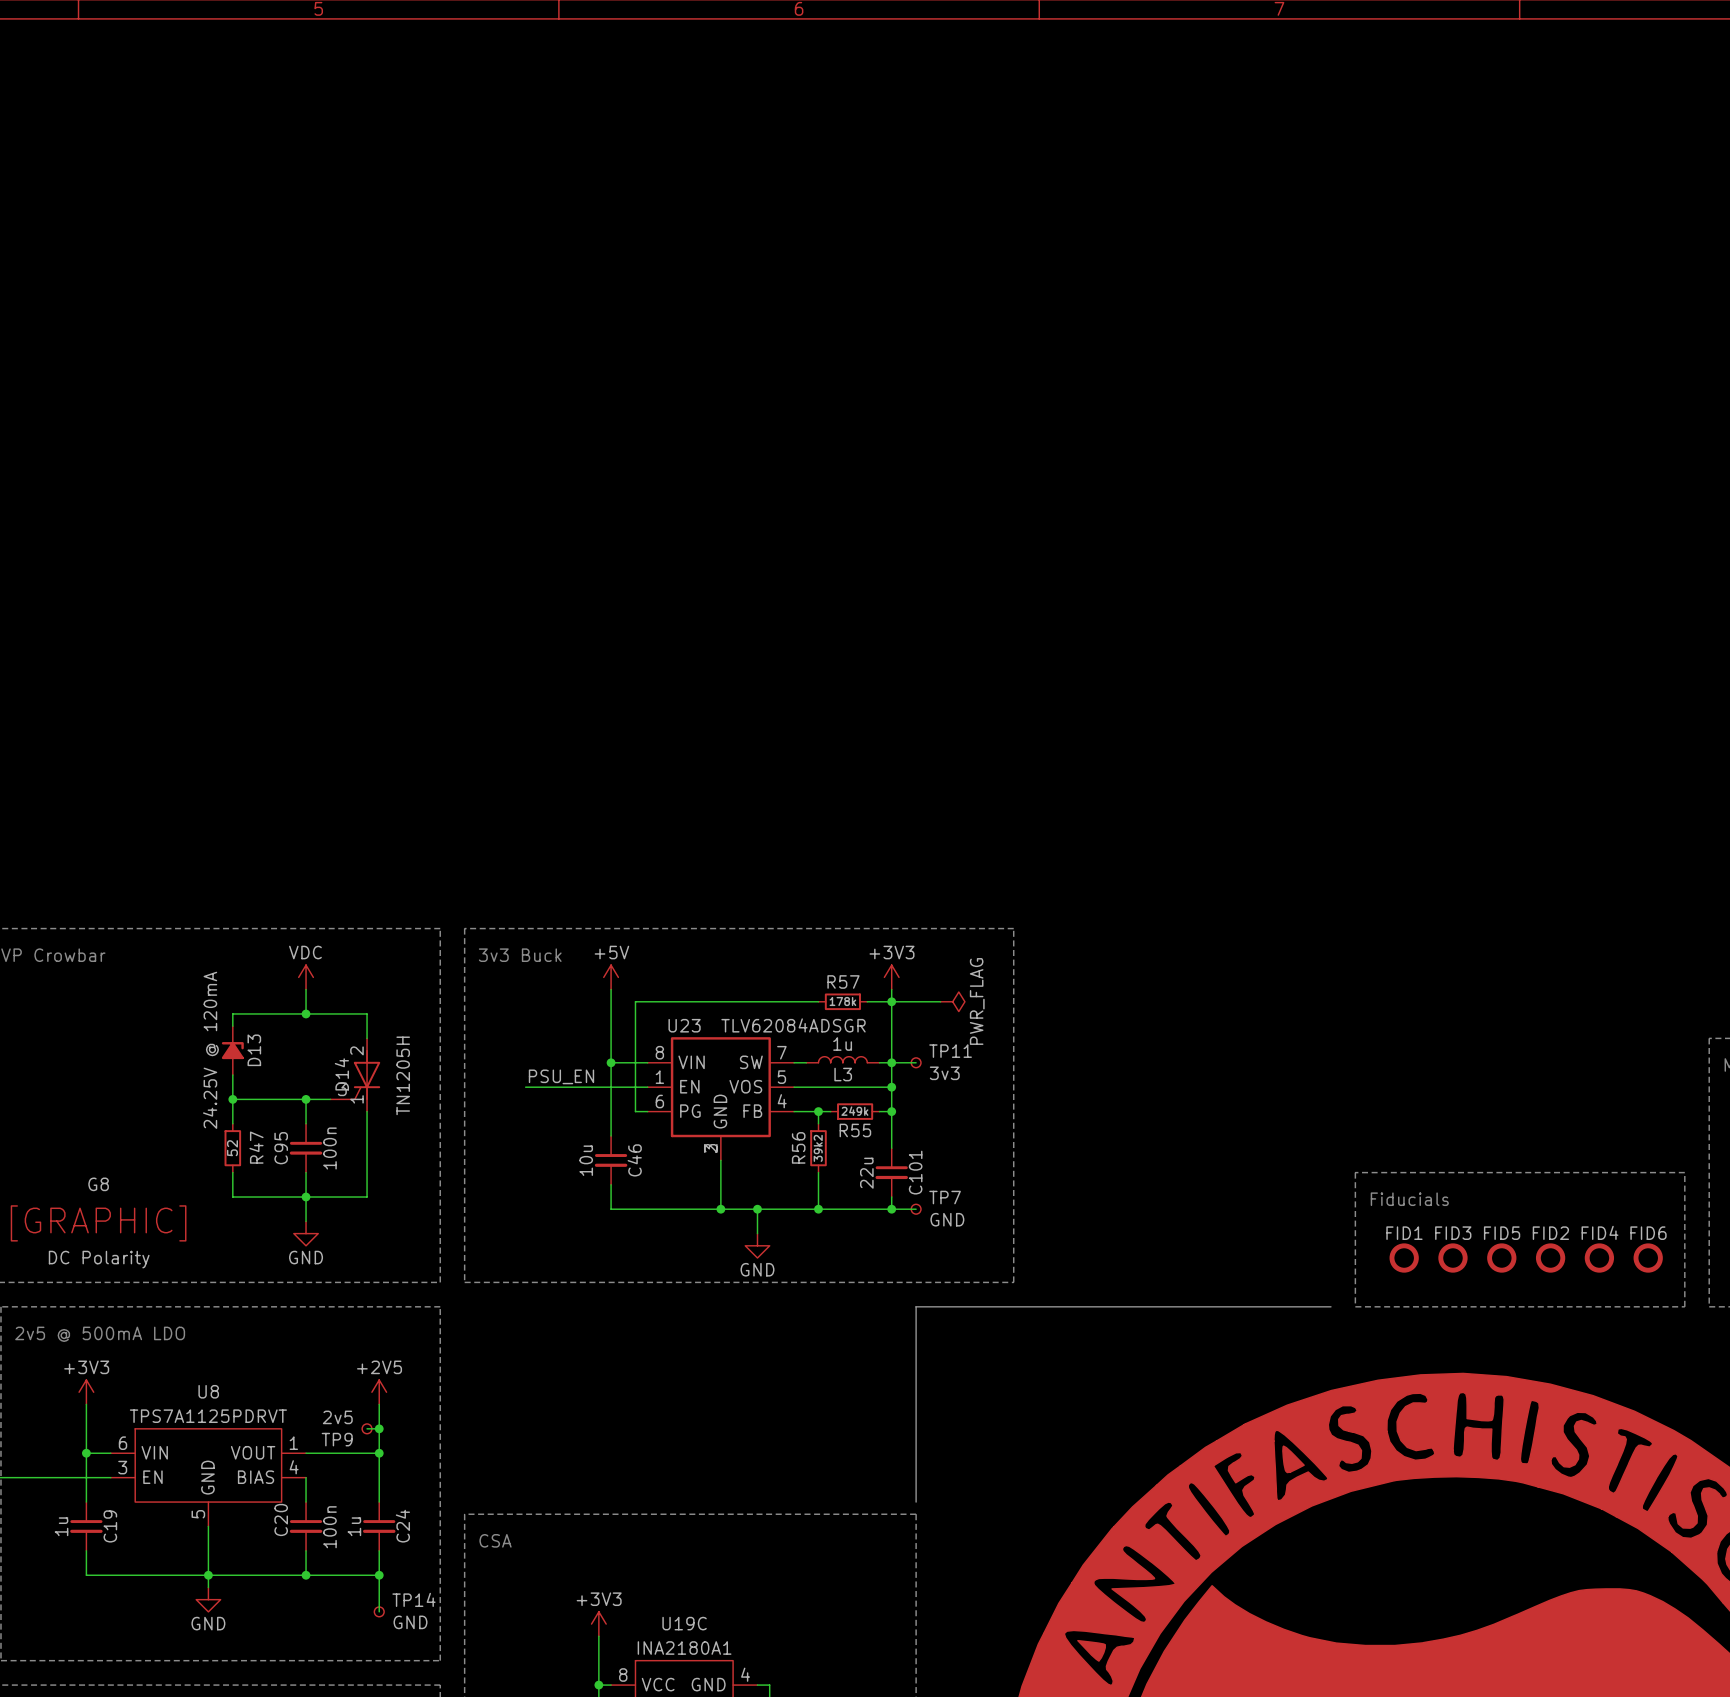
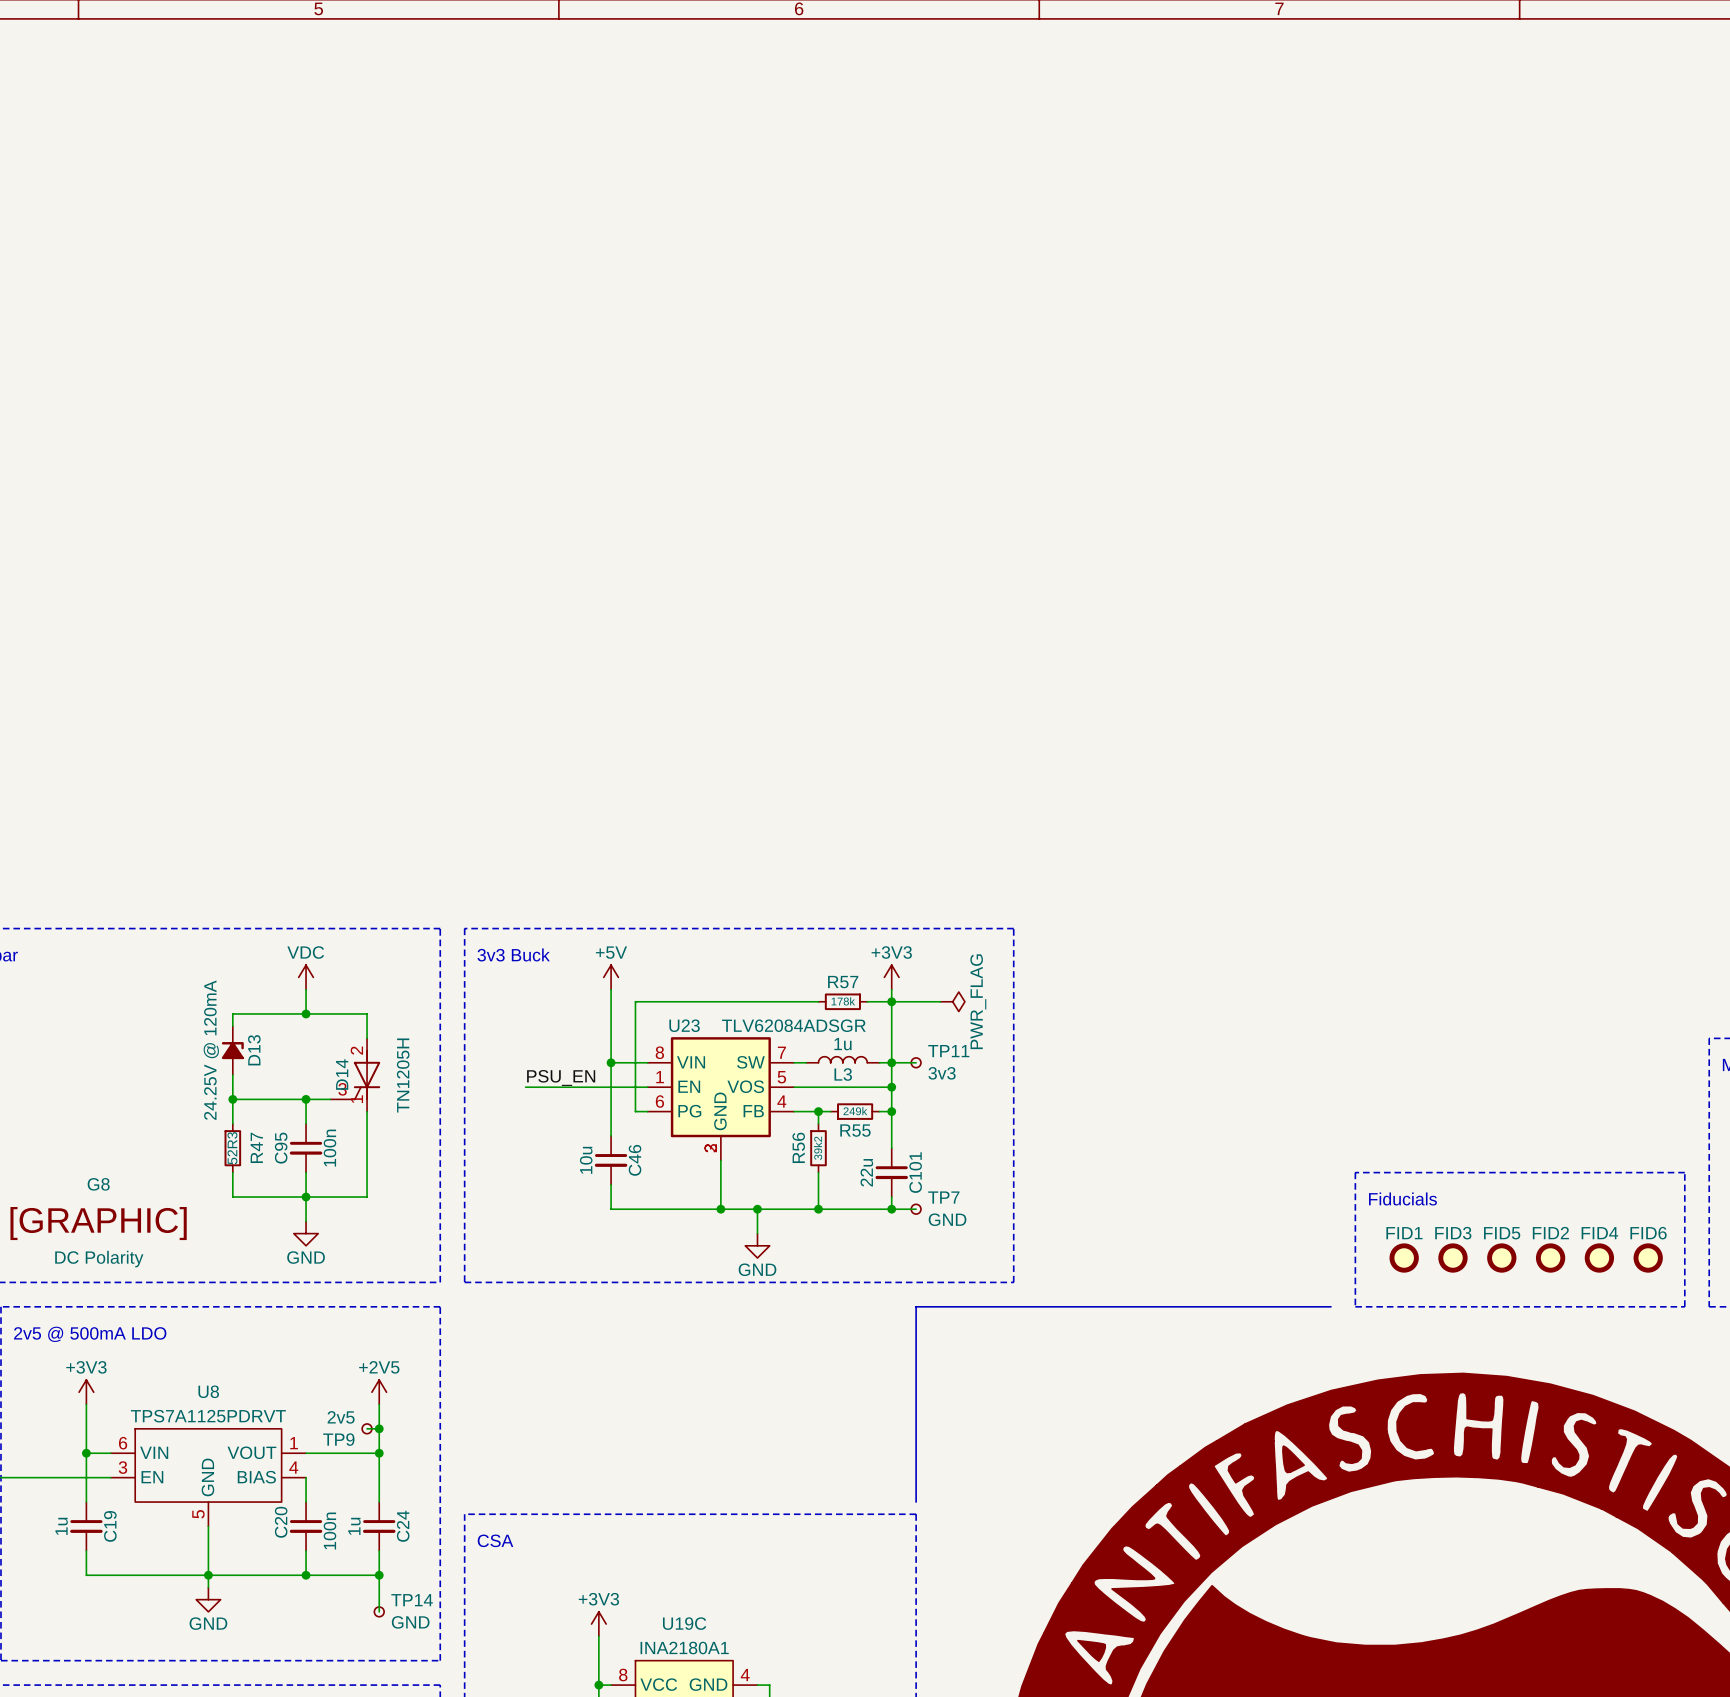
R47 value: 52 (232, 1148) -> 52R3 (232, 1148)

